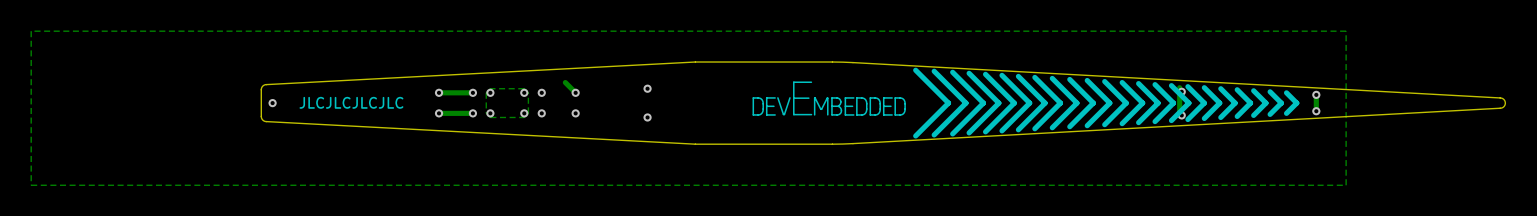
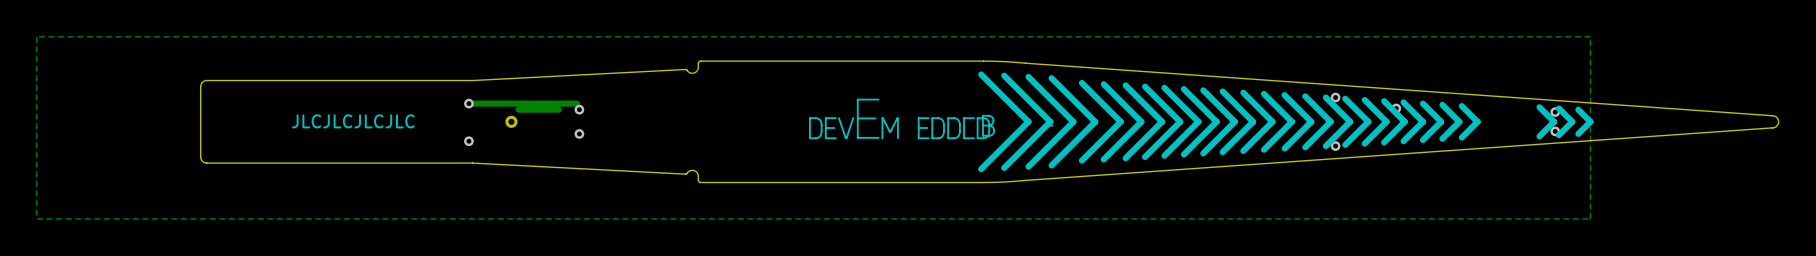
line: none -> (981, 74) (1028, 121) (981, 169)
line: none -> (1004, 75) (1050, 121) (1004, 167)
line: none -> (1028, 76) (1073, 121) (1028, 166)
line: none -> (1051, 78) (1095, 121) (1051, 165)
track: (565, 82) (575, 92) -> none
line: (811, 82) (793, 82) (793, 114) (811, 114) -> (878, 99) (857, 99) (857, 137) (878, 137)
via: none -> (1335, 97)
via: none -> (468, 103)
track: none -> (576, 103) (468, 103)
track: (1179, 87) (1179, 113) (1181, 115) -> none
zone outline: (524, 88) (528, 92) (528, 113) (524, 117) (490, 117) (486, 113) (486, 92) (490, 88) (524, 88) -> none
via: (647, 88) -> none
line: (1253, 90) (1265, 103) (1253, 115) -> (1539, 107) (1554, 121) (1539, 136)
line: (1270, 91) (1281, 103) (1270, 114) -> (1558, 108) (1572, 121) (1558, 135)
via: (439, 92) -> none
via: (472, 92) -> none
via: (524, 92) -> none
via: (541, 92) -> none
via: (575, 92) -> none
line: (1286, 92) (1296, 103) (1286, 113) -> (1578, 109) (1590, 121) (1578, 133)
track: (1316, 94) (1316, 111) -> none
line: (758, 97) (753, 97) (753, 114) (760, 114) (762, 111) (762, 101) (758, 97) -> (815, 118) (809, 118) (809, 138) (817, 137) (821, 133) (821, 122) (815, 118)
line: (775, 97) (766, 97) (766, 114) (775, 114) -> (835, 118) (825, 118) (825, 138) (835, 138)
line: (789, 97) (784, 114) (777, 97) -> (853, 118) (846, 137) (838, 118)
line: (853, 97) (845, 97) (845, 114) (853, 114) -> (928, 118) (918, 118) (918, 138) (928, 138)
line: (861, 97) (856, 97) (856, 114) (863, 114) (866, 111) (866, 101) (861, 97) -> (937, 118) (932, 118) (932, 138) (940, 137) (943, 133) (943, 122) (937, 118)
line: (875, 97) (870, 97) (870, 114) (877, 114) (879, 111) (879, 101) (875, 97) -> (953, 118) (948, 118) (948, 138) (956, 137) (959, 133) (959, 122) (953, 118)
line: (892, 97) (883, 97) (883, 114) (892, 114) -> (974, 118) (964, 118) (964, 138) (973, 138)
line: (900, 97) (895, 97) (895, 114) (901, 114) (904, 111) (904, 101) (900, 97) -> (983, 118) (977, 118) (977, 138) (985, 137) (989, 133) (988, 122) (983, 118)
board edge: (1500, 97) (832, 62) (695, 62) (266, 84) (262, 86) (261, 89) (261, 117) (265, 121) (695, 144) (852, 143) (1500, 108) -> (1772, 115) (994, 61) (700, 61) (698, 62) (697, 70) (692, 73) (685, 69) (472, 80) (206, 80) (202, 82) (200, 86) (200, 157) (205, 163) (472, 163) (685, 174) (692, 170) (697, 173) (698, 181) (700, 182) (1004, 181) (1772, 127)
line: (808, 98) (793, 98) -> (875, 118) (857, 118)
text position: JLCJLCJLCJLC (351, 102) -> JLCJLCJLCJLC (353, 121)
via: (272, 103) -> none
part: none -> (511, 121)
line: (773, 106) (766, 106) -> (834, 128) (825, 128)
line: (852, 106) (845, 106) -> (927, 128) (918, 128)
via: (439, 113) -> none
track: (472, 113) (439, 113) -> none
via: (472, 113) -> none
via: (524, 113) -> none
via: (541, 113) -> none
via: (575, 113) -> none
line: (827, 114) (827, 98) (820, 109) (814, 98) (814, 114) -> (897, 138) (897, 118) (889, 131) (882, 118) (882, 138)
via: (1181, 115) -> none
via: (647, 117) -> none
via: none -> (468, 141)
via: none -> (1335, 146)

